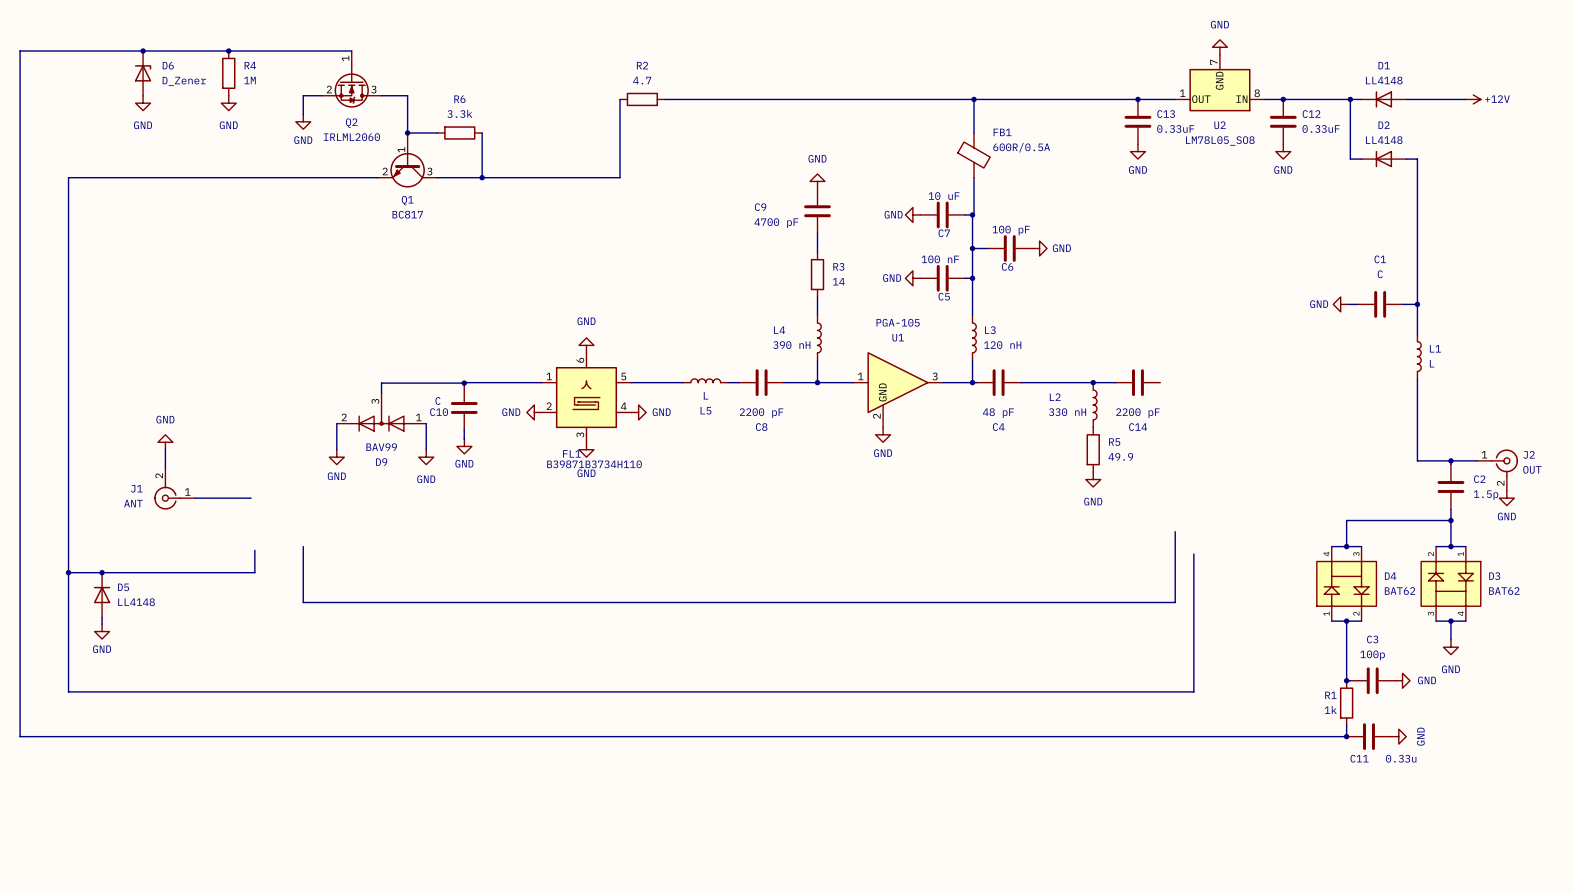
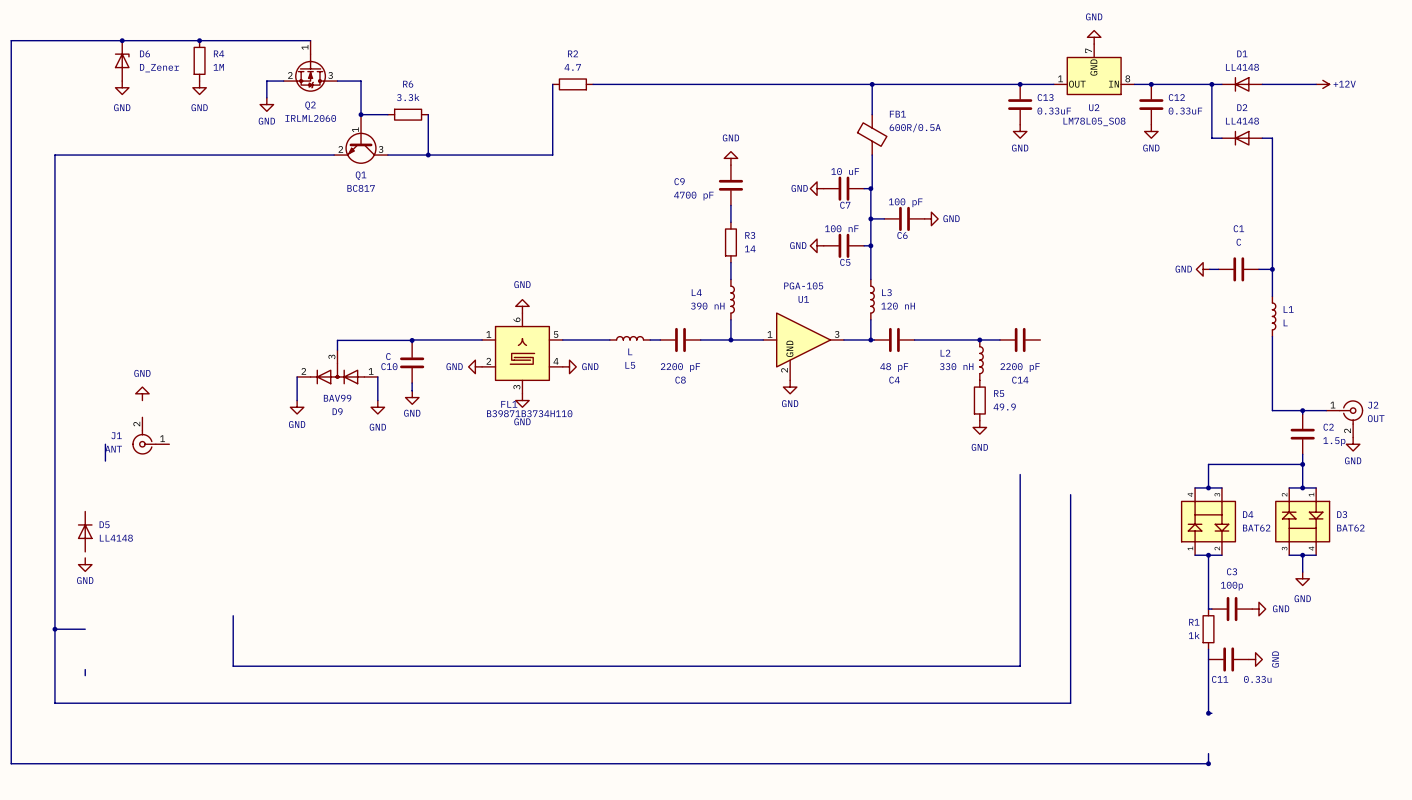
wire: (165, 449) (165, 468) -> (105, 444) (105, 461)
wire: (195, 498) (251, 498) -> none
wire: none -> (1020, 474) (1020, 666) (233, 666) (233, 615)
wire: (1175, 531) (1175, 602) (303, 602) (303, 546) -> none
wire: (254, 550) (254, 572) (68, 572) -> none
junction: (68, 572) -> none
junction: (102, 572) -> none
wire: (102, 617) (102, 624) -> (85, 669) (85, 675)
junction: (1346, 680) -> none
wire: (68, 691) (1193, 691) -> (54, 619) (54, 703) (1070, 703) (1070, 619)
wire: none -> (54, 629) (85, 629)
junction: none -> (54, 629)
wire: (20, 736) (1346, 736) -> (11, 659) (11, 763) (1208, 763) (1208, 753)
wire: none -> (1208, 659) (1208, 713) (1211, 713)
junction: (1346, 736) -> none
junction: none -> (1208, 713)
junction: none -> (1208, 763)

